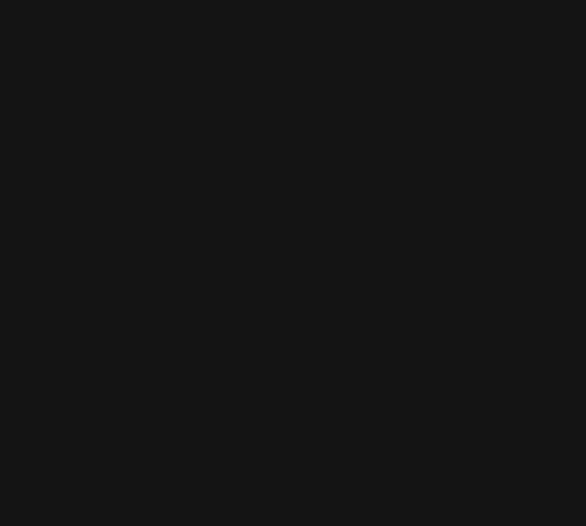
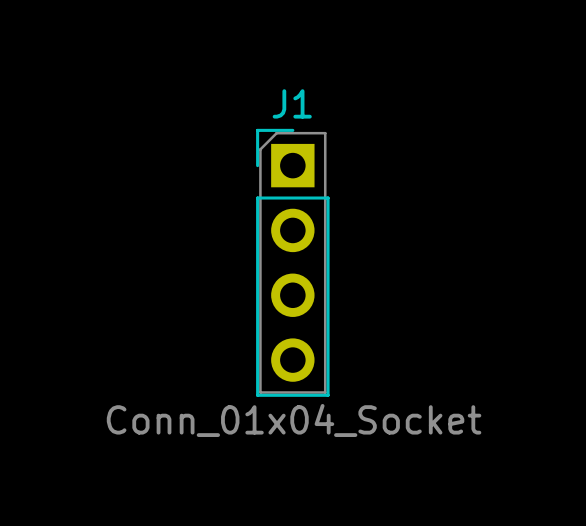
J1: none -> Conn_01x04_Socket (292, 262)

